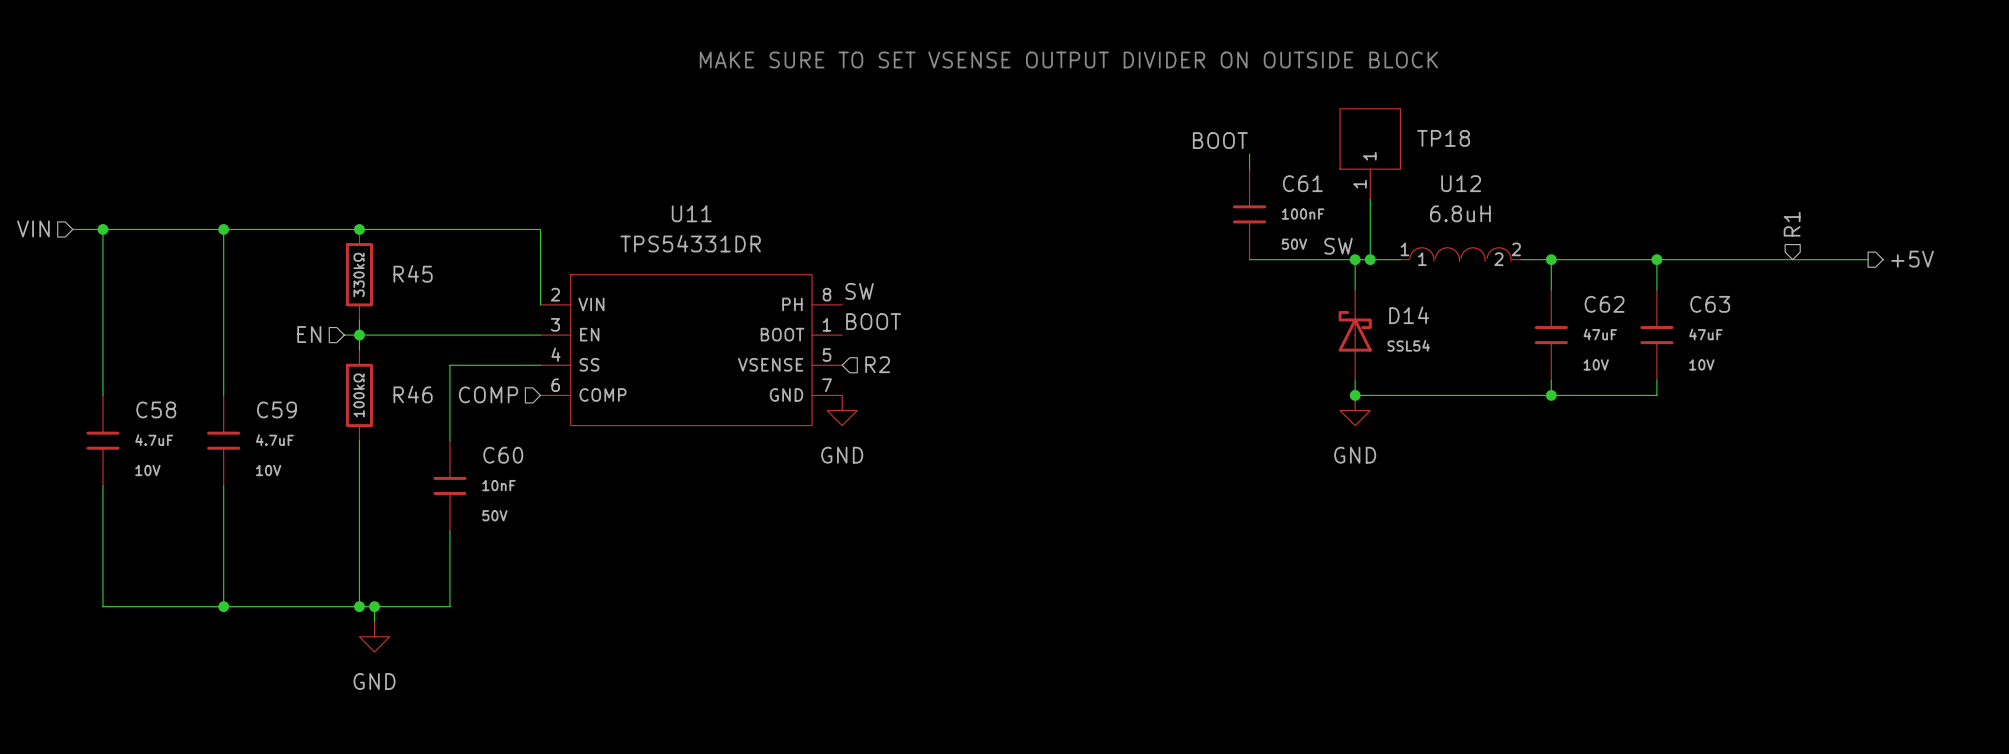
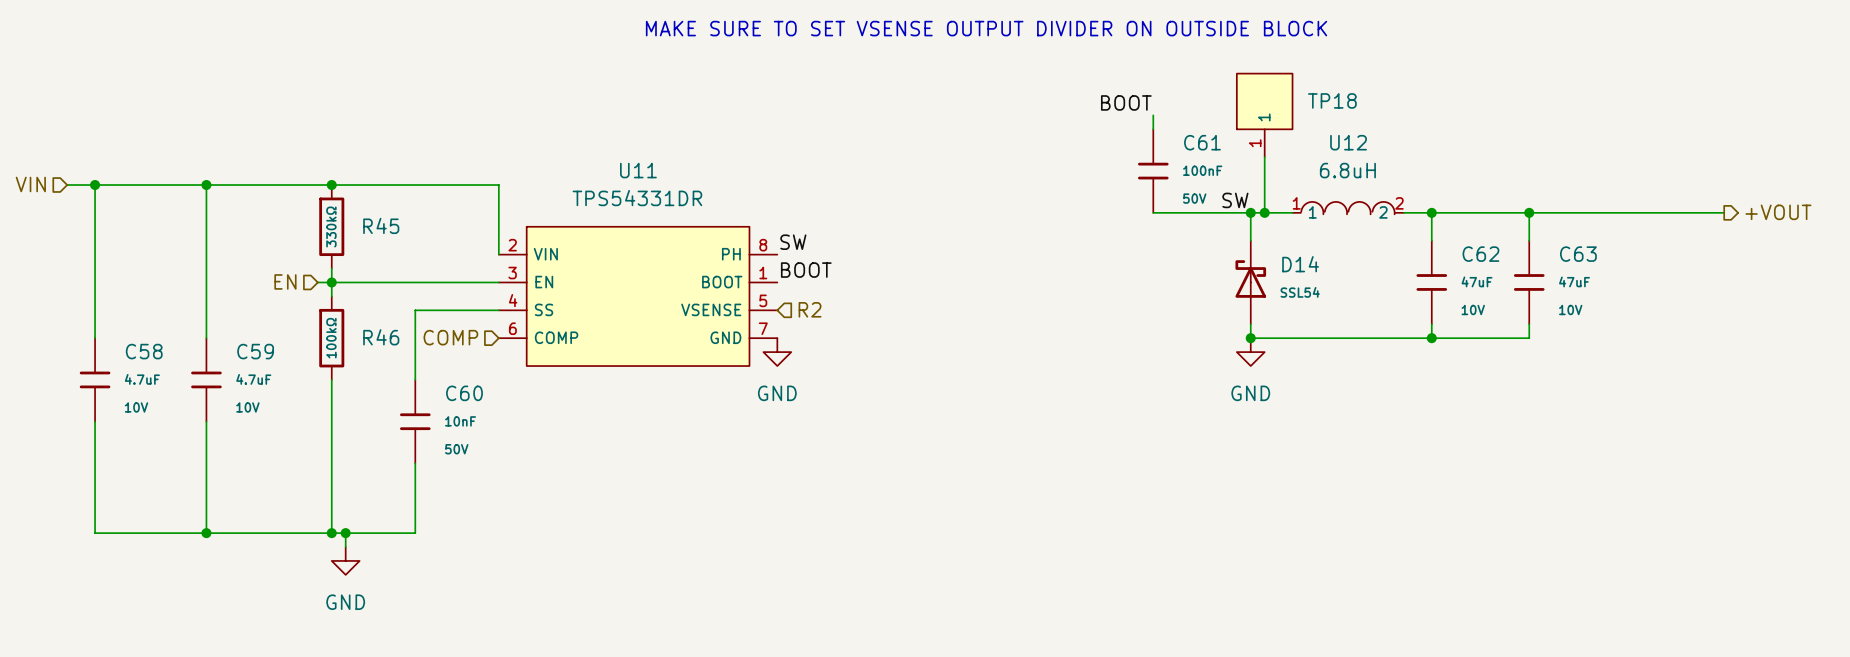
hierarchical label: R1 (1792, 224) -> none
hierarchical label: +5V (1912, 259) -> +VOUT (1778, 212)

